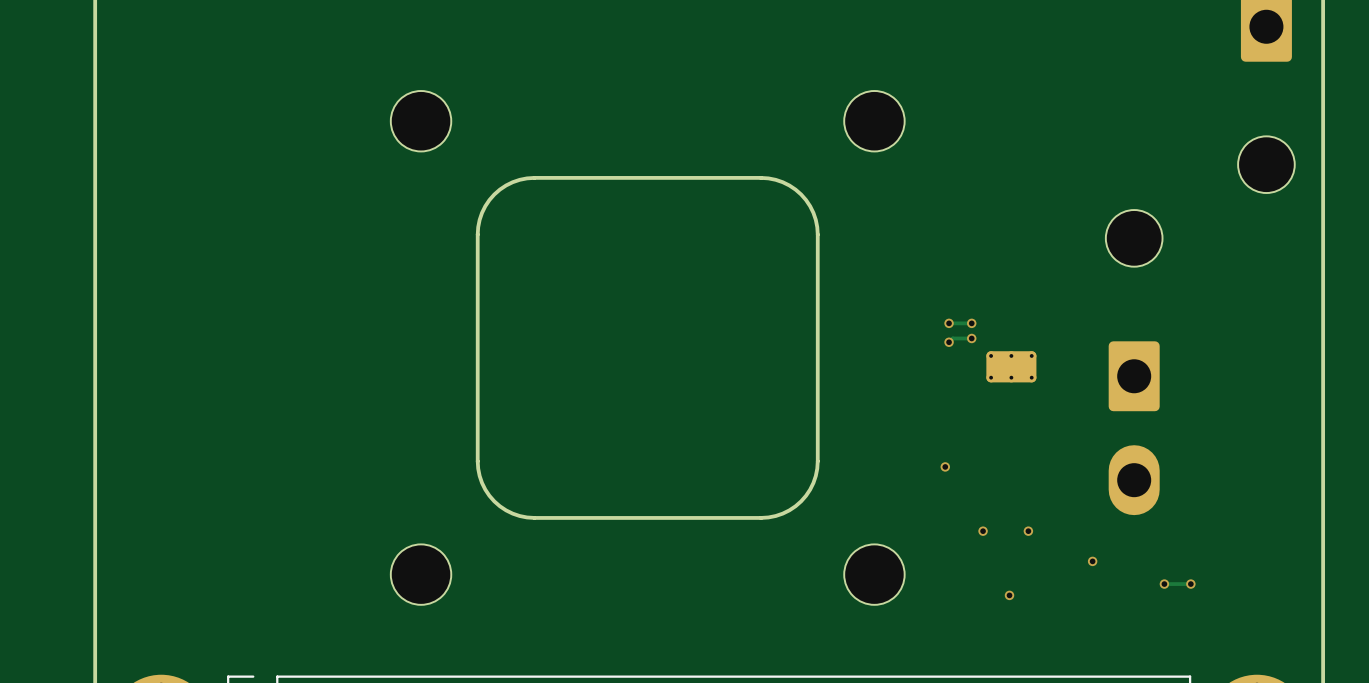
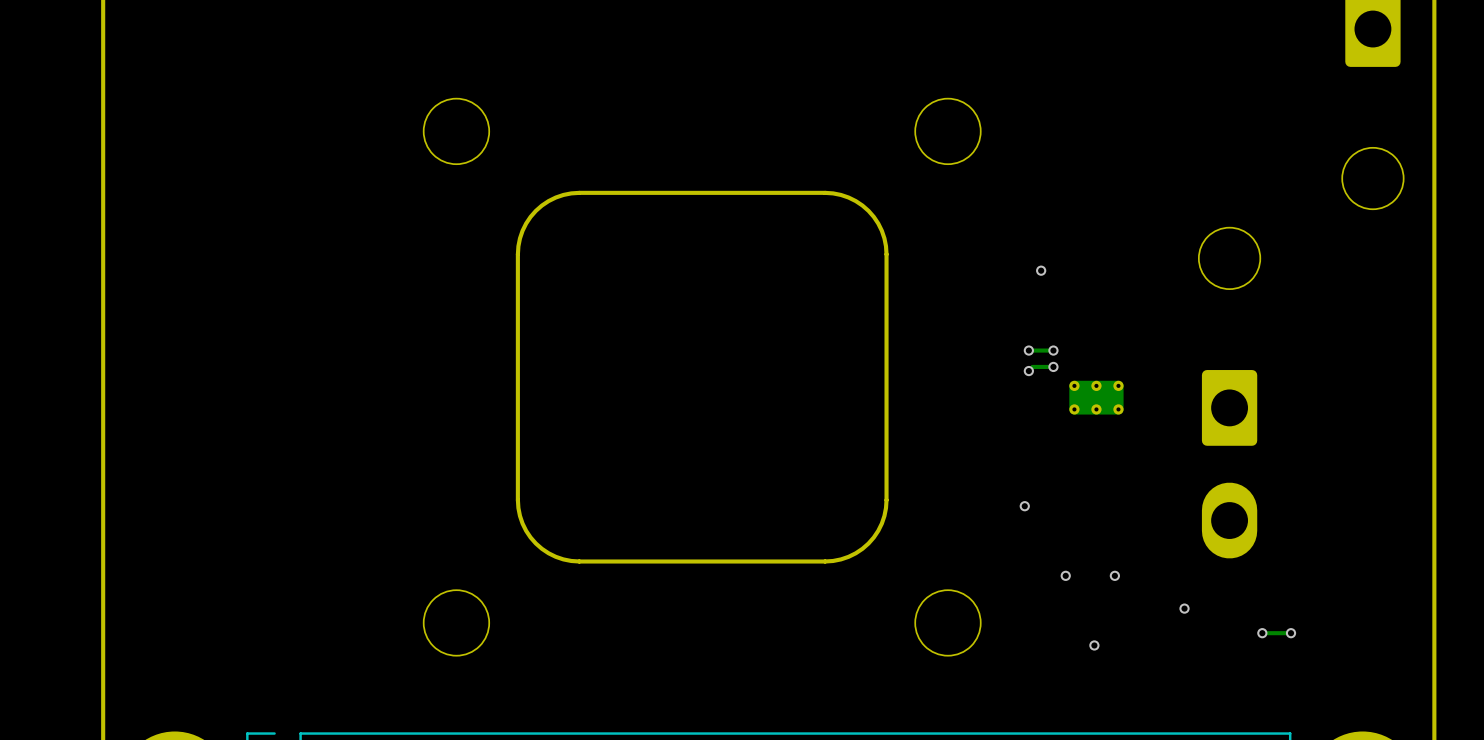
via: none -> (1041, 270)

